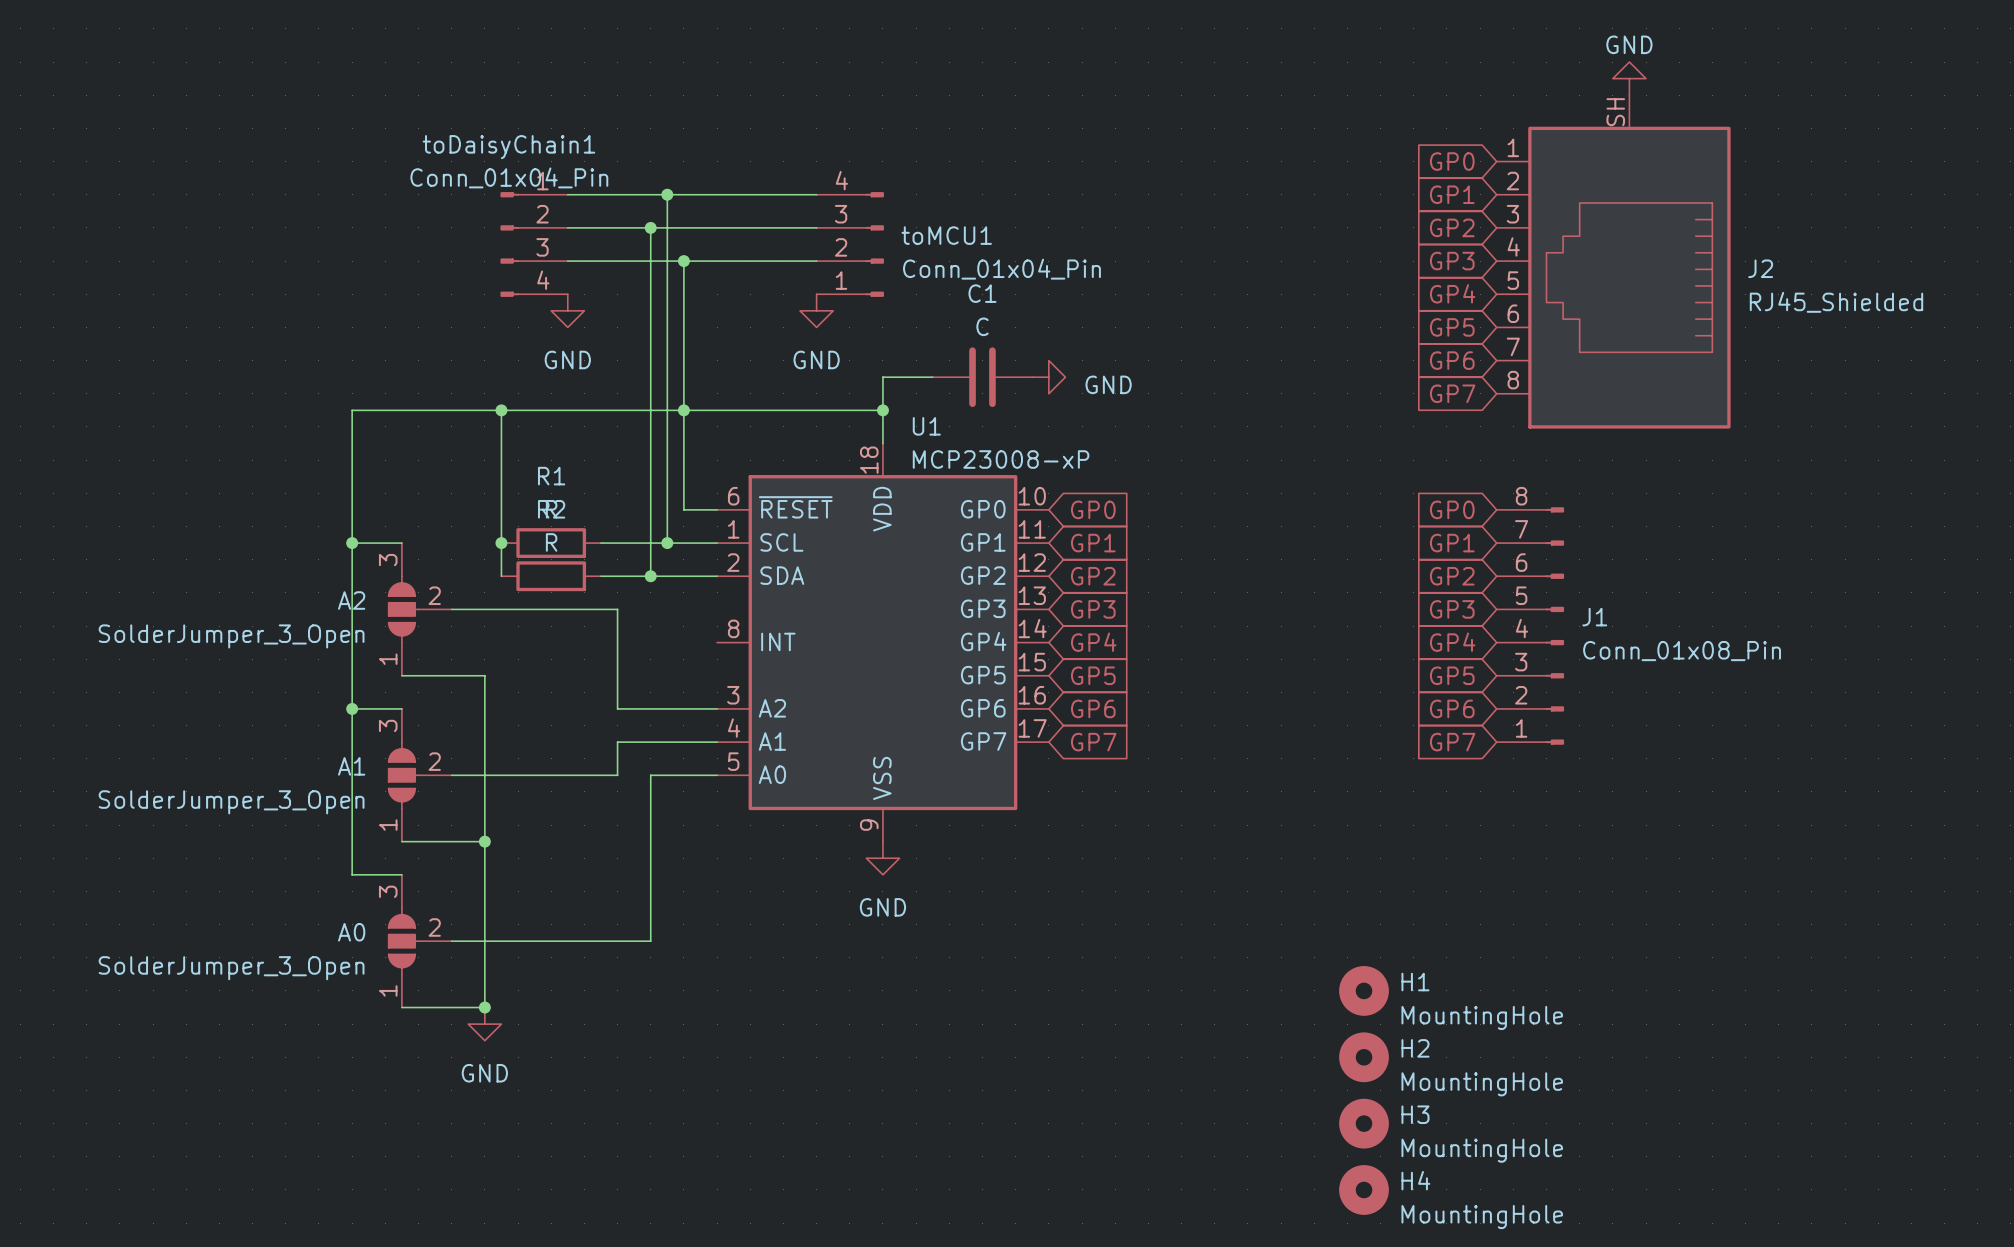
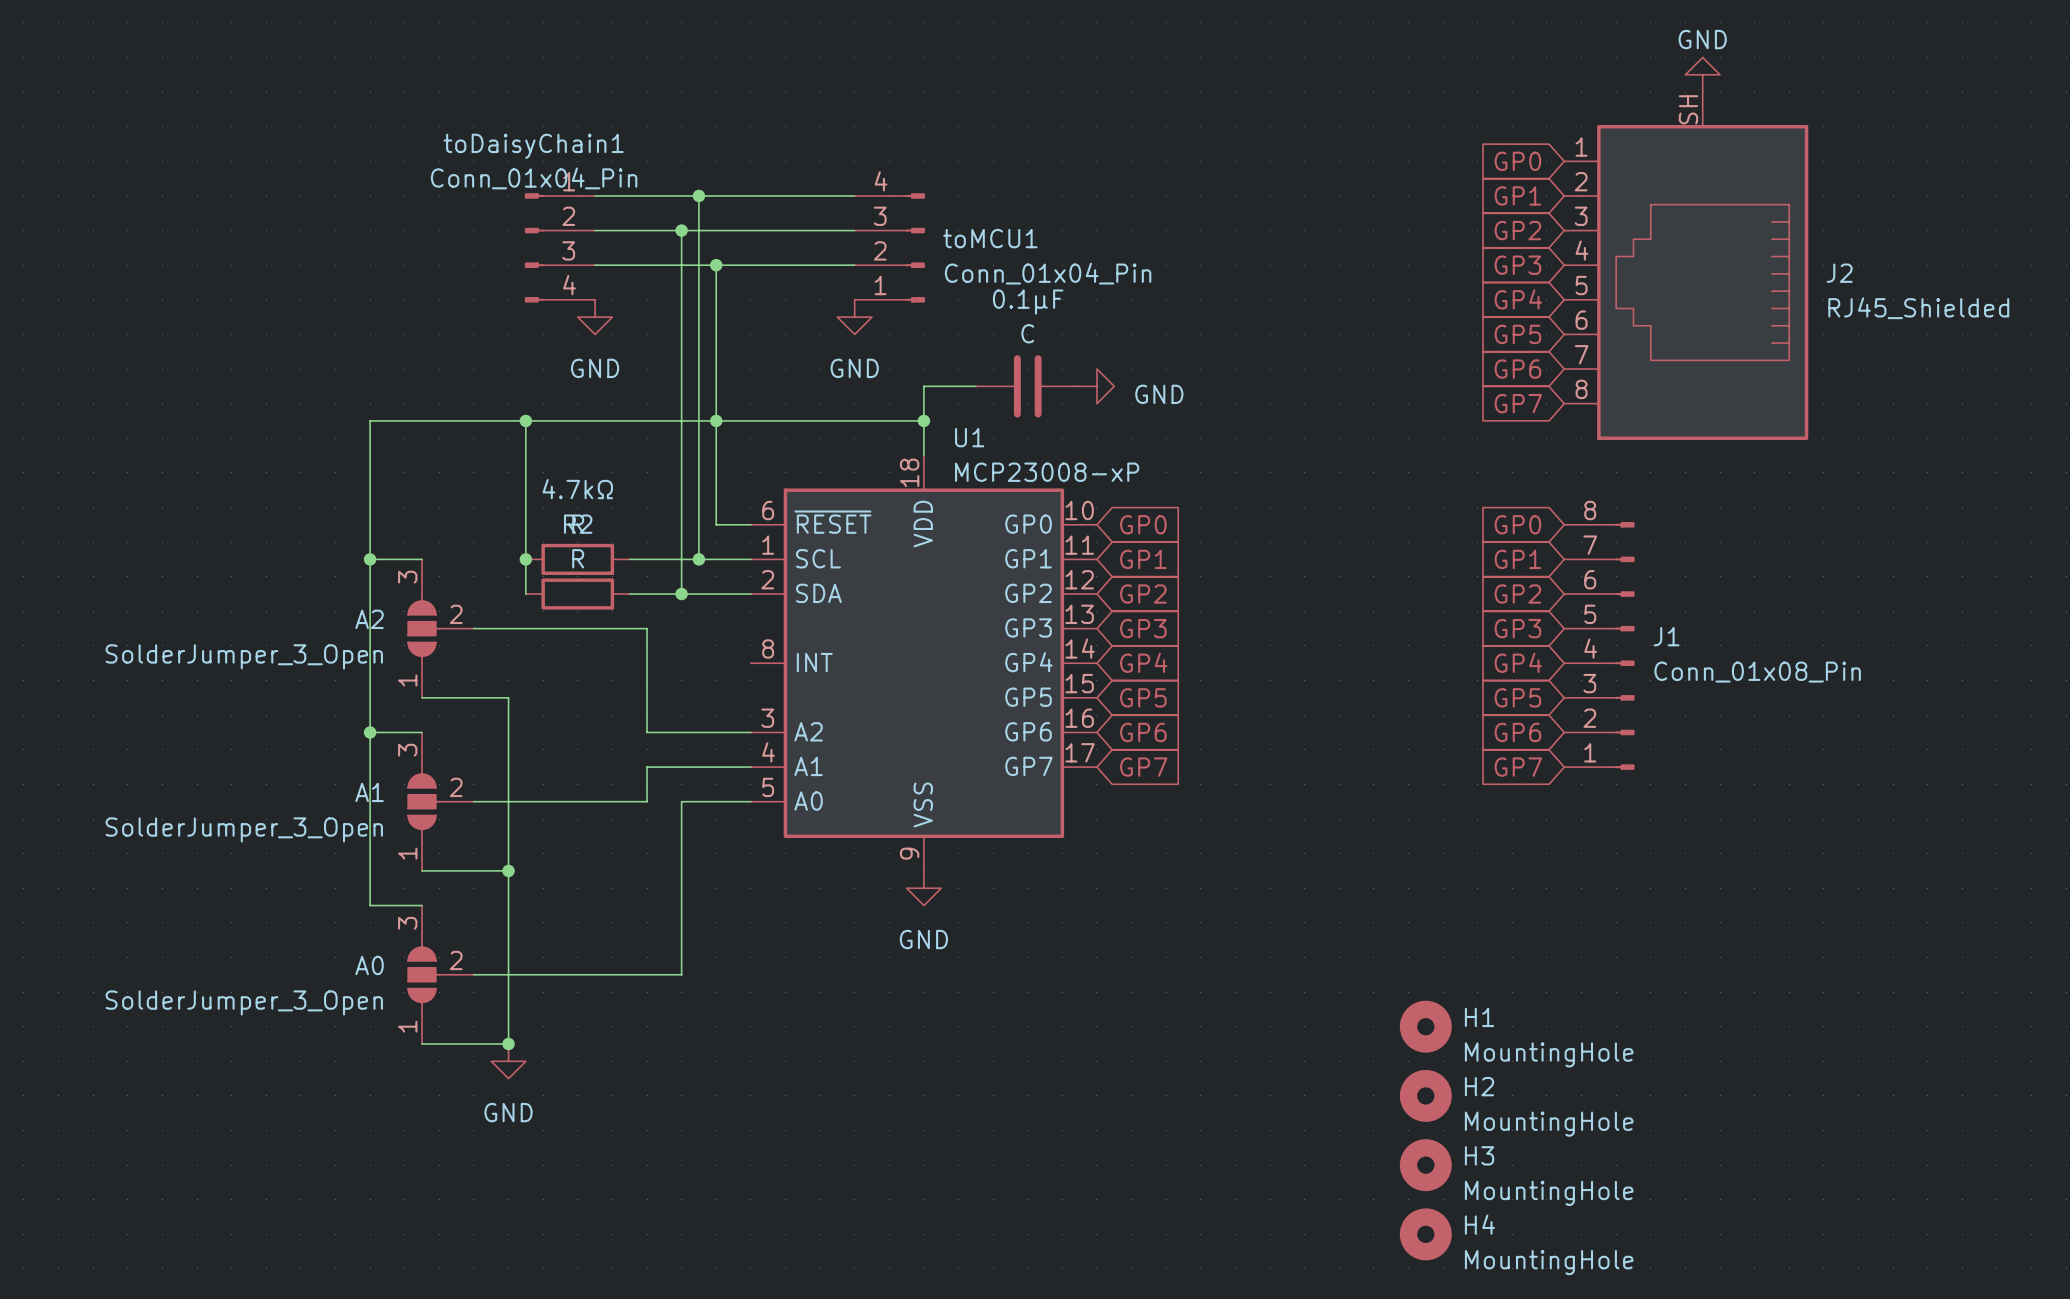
C1 name: C1 (982, 293) -> 0.1μF (1028, 302)
R1 name: R1 (551, 476) -> 4.7kΩ (577, 489)

